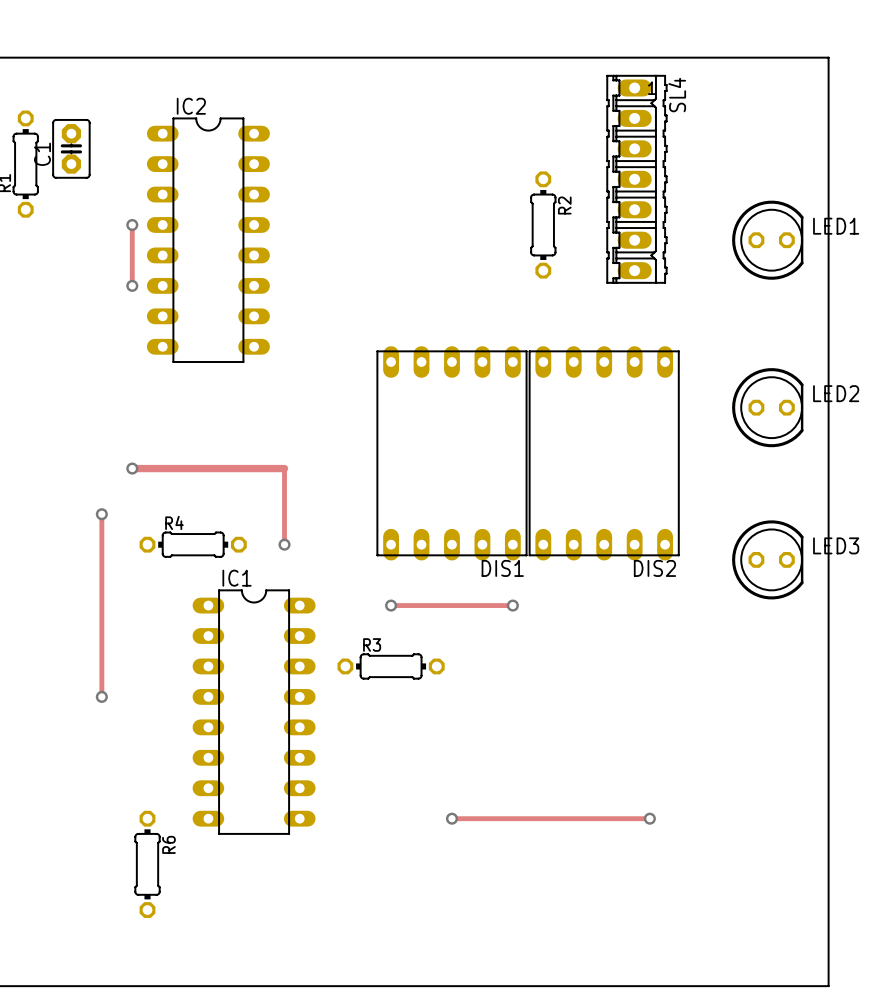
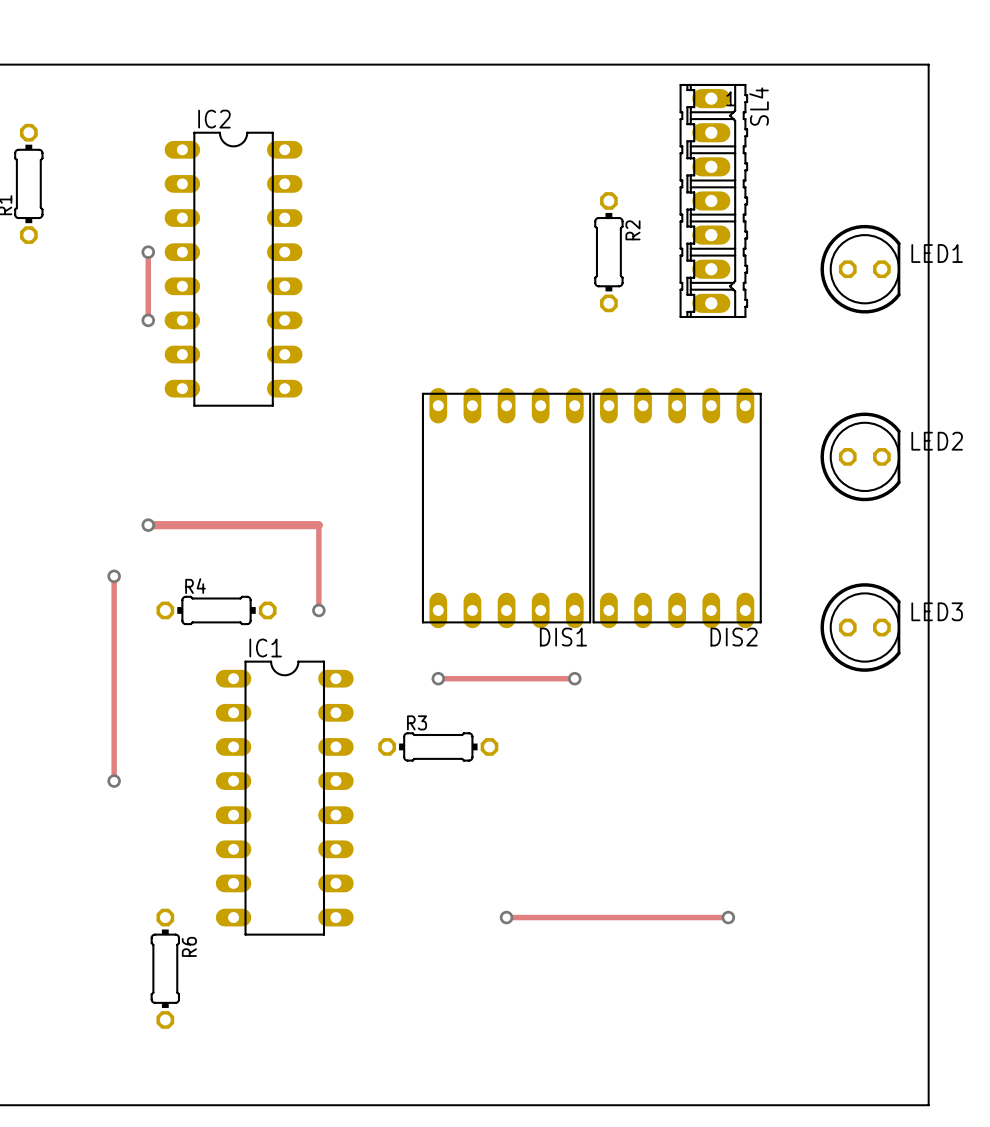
C1: (71, 148) -> none

